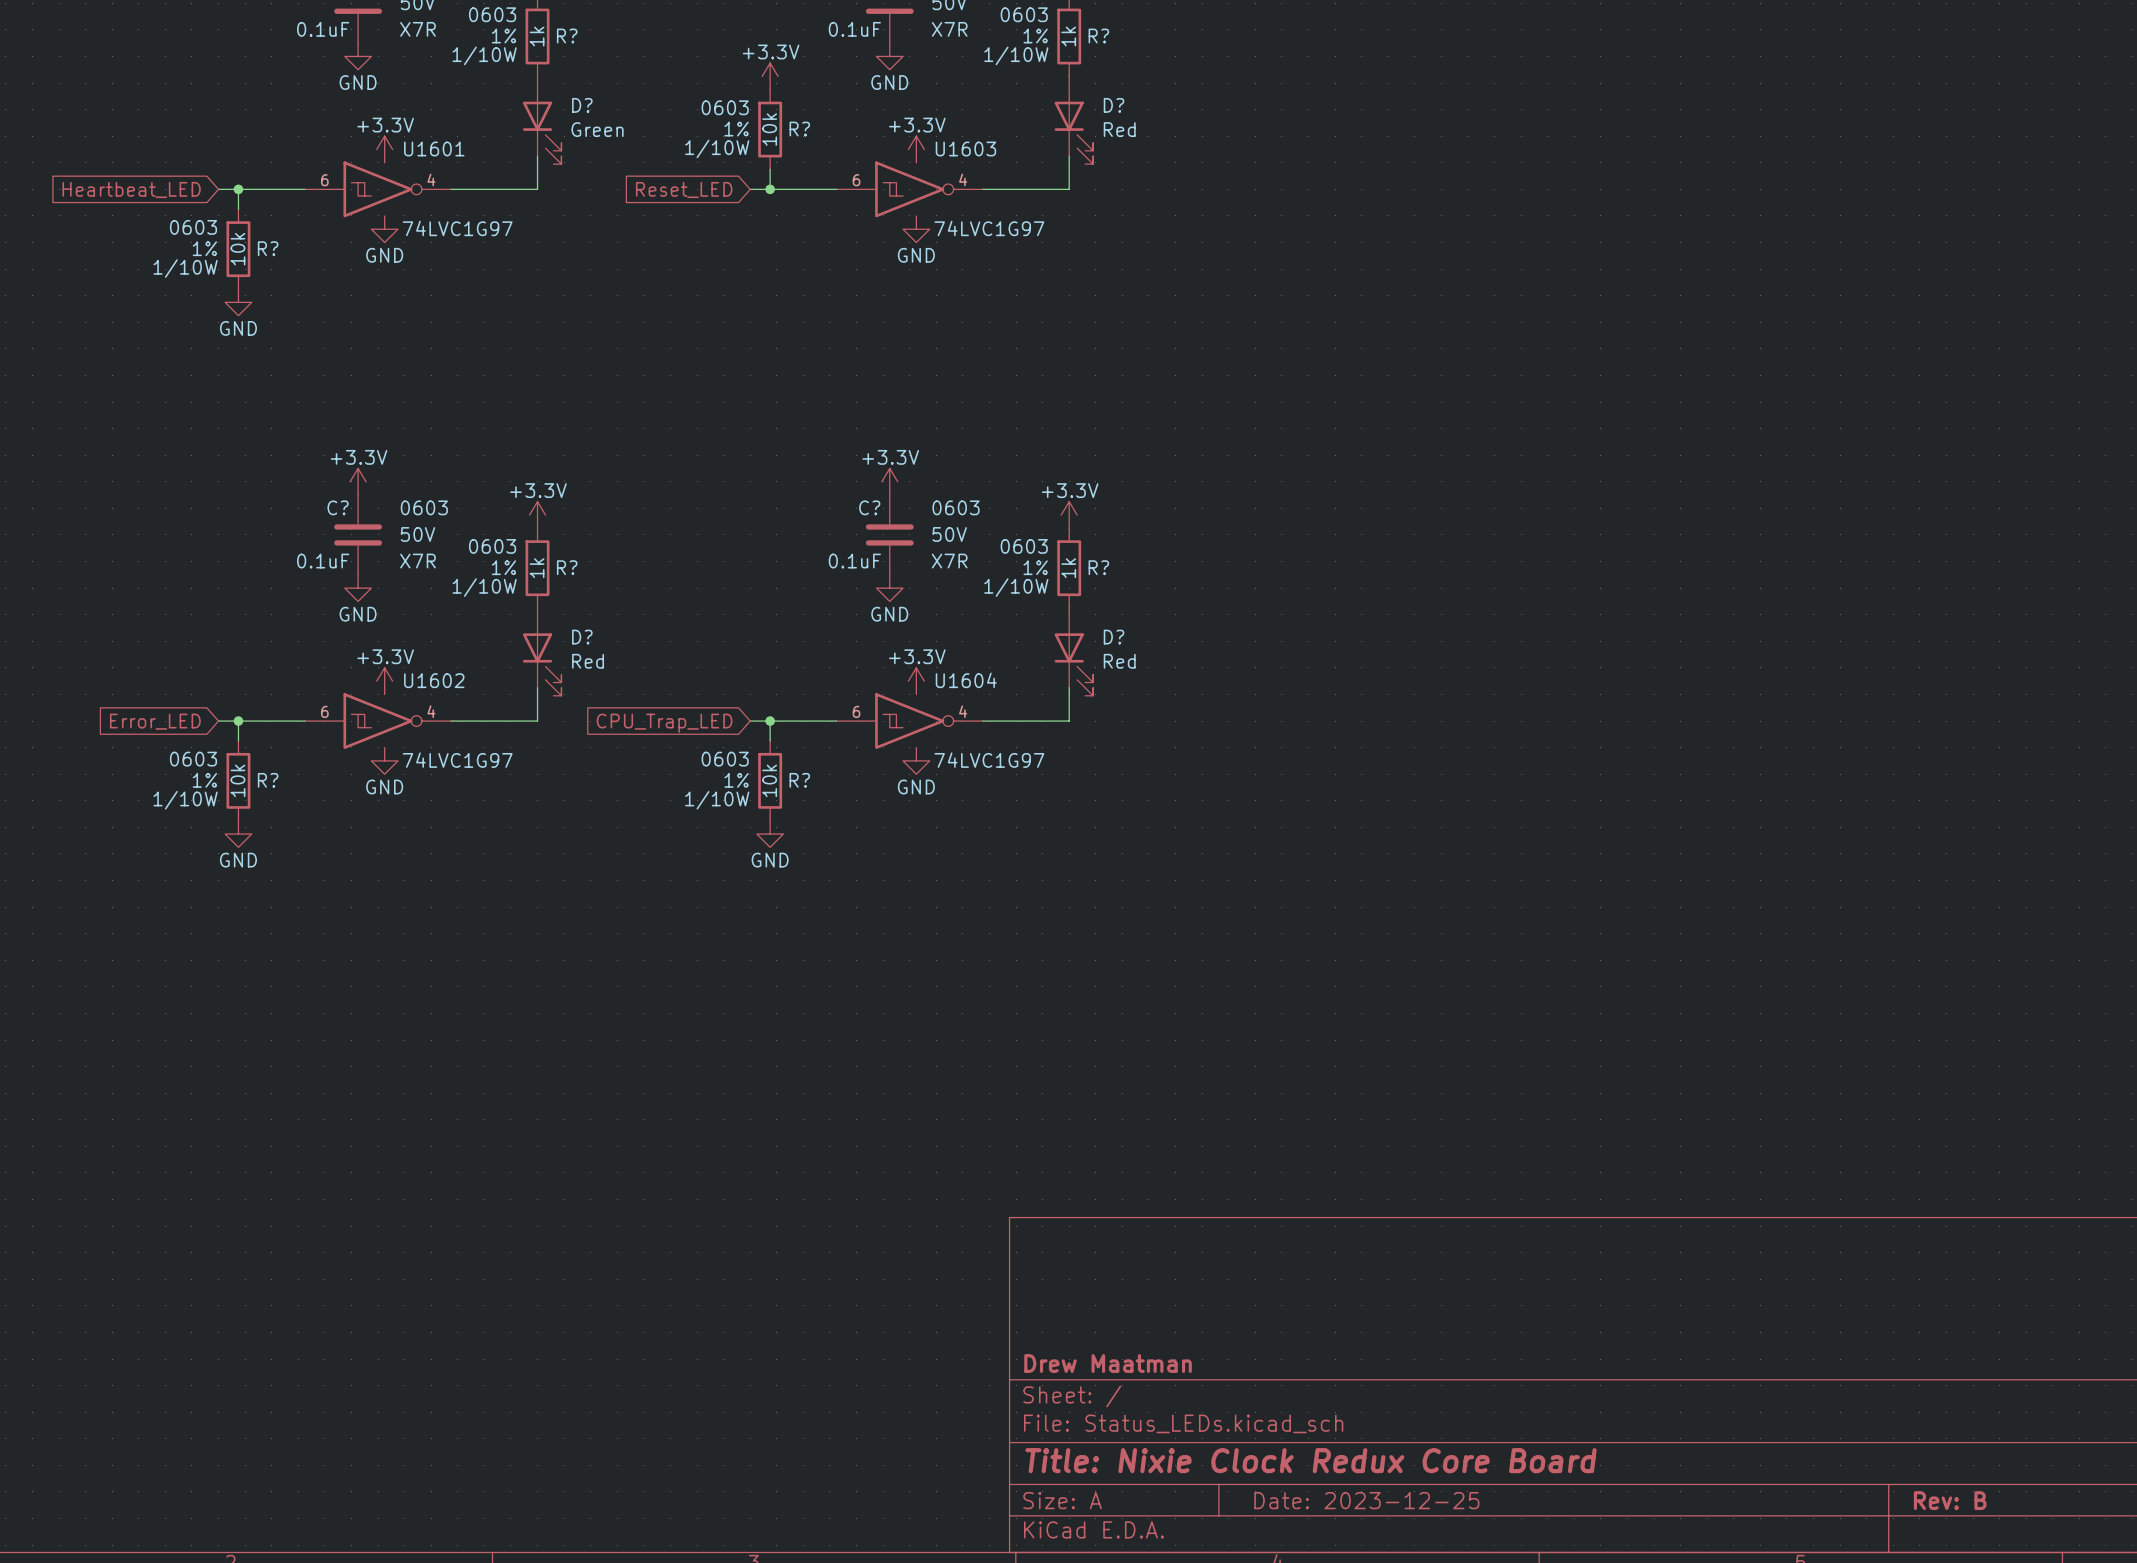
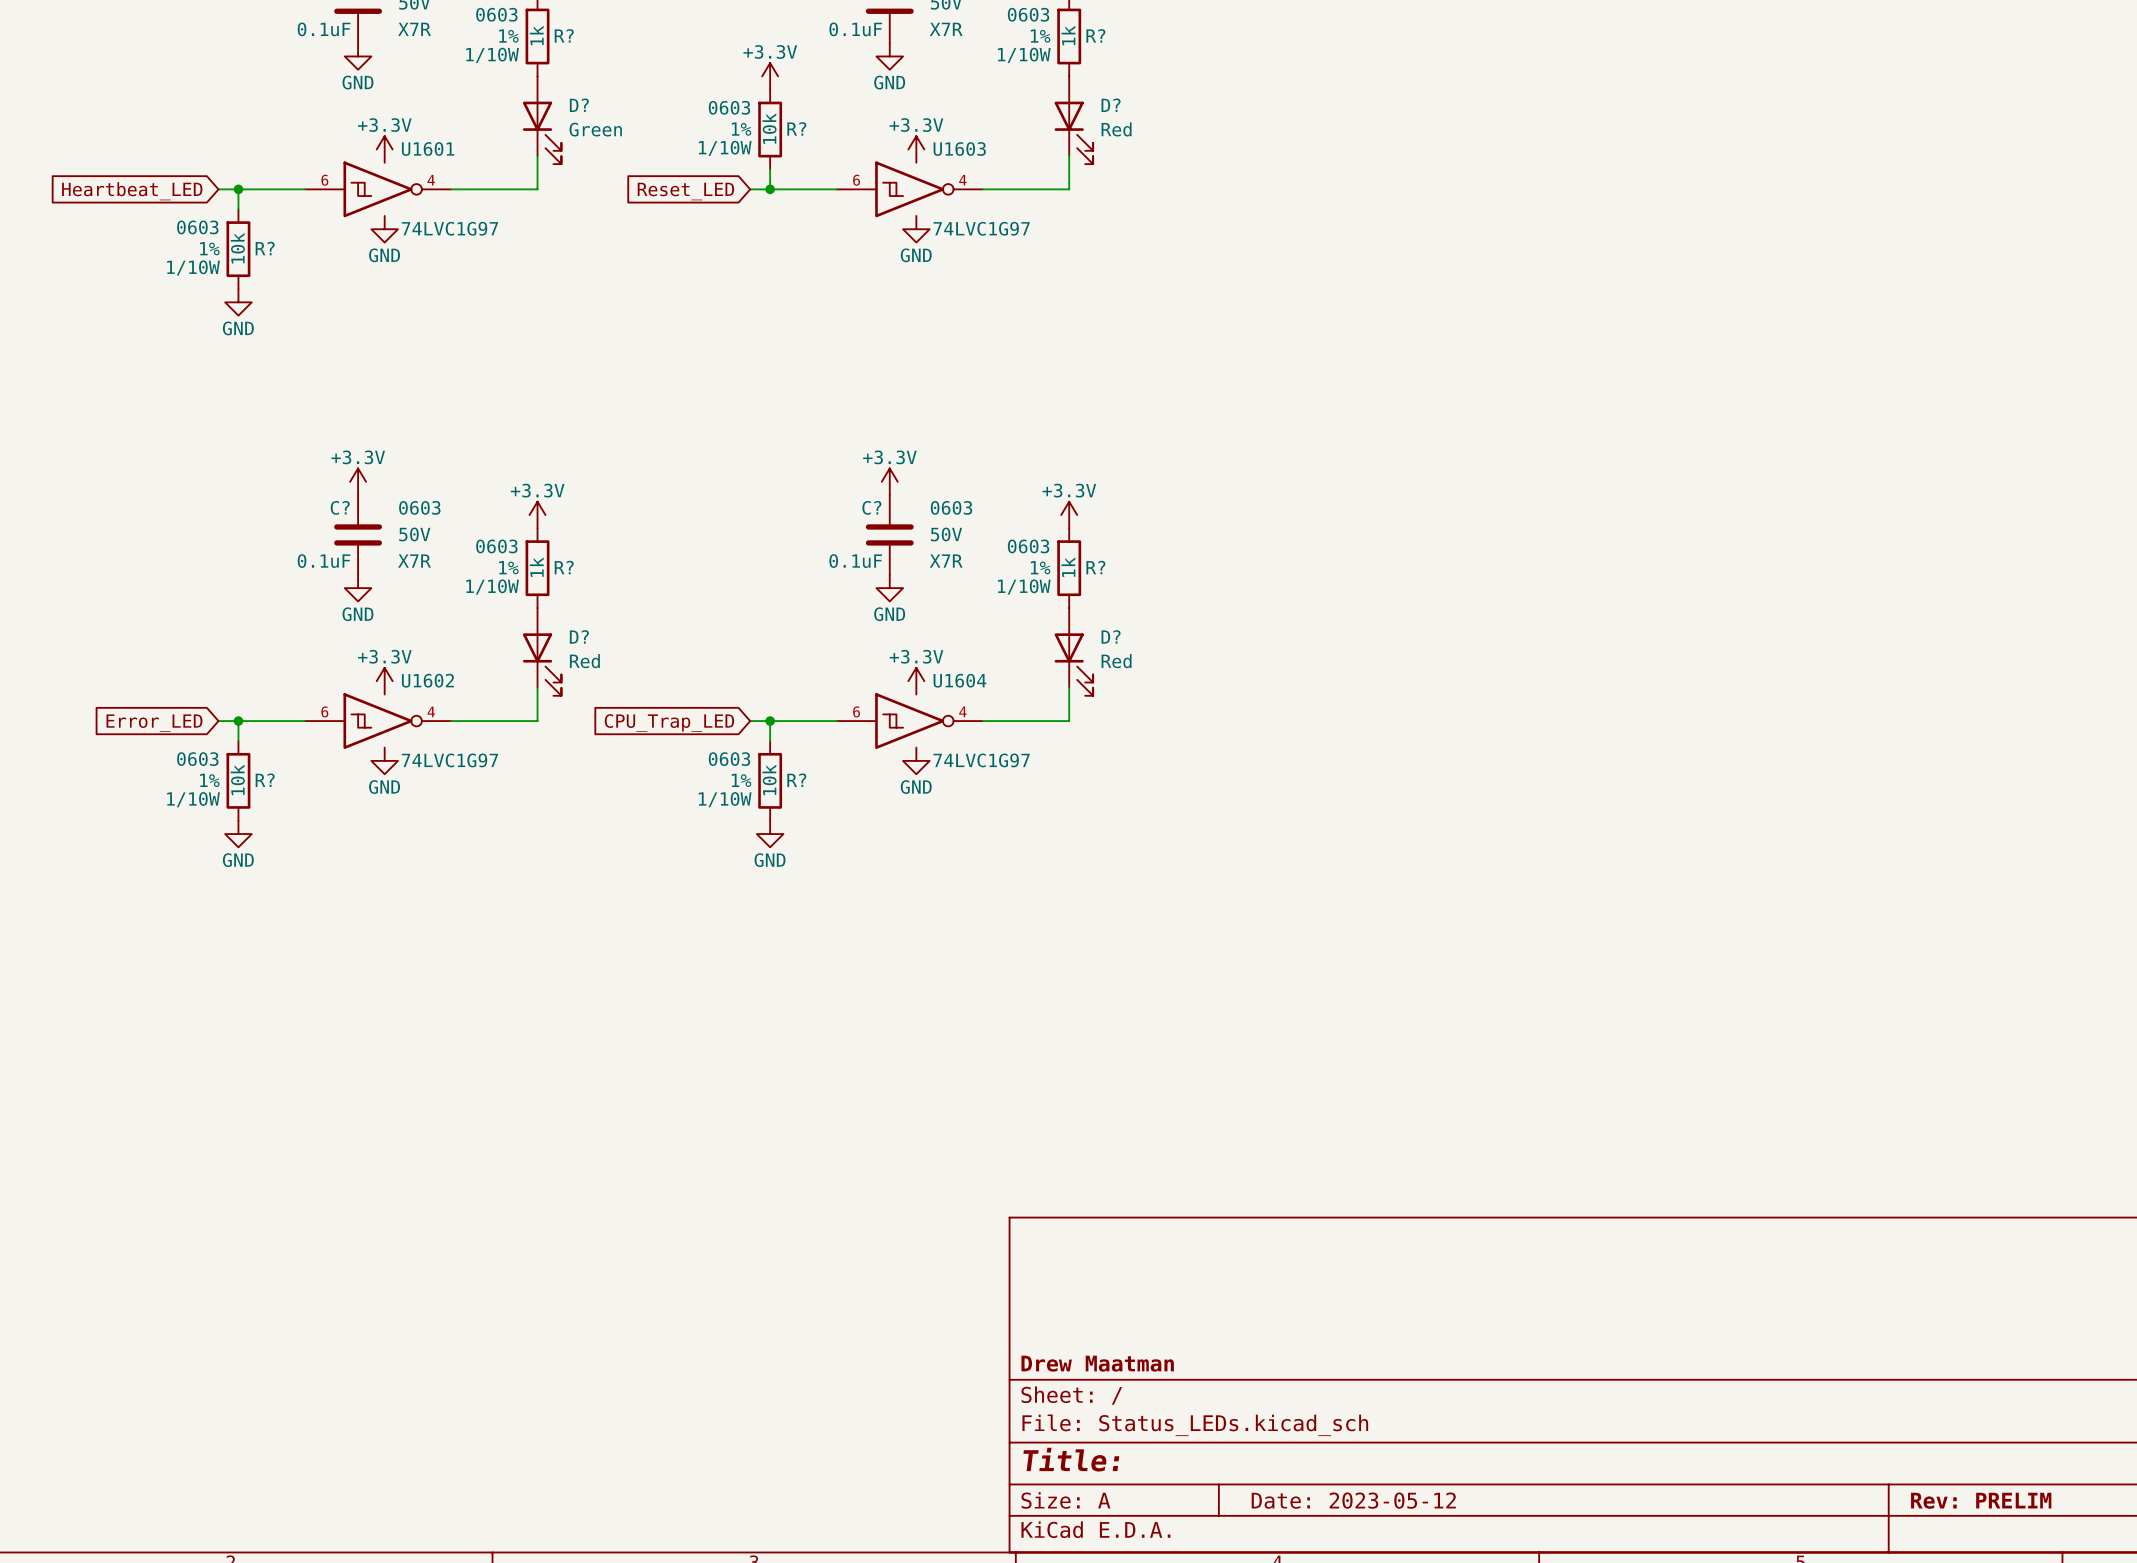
title block: Title: Nixie Clock Redux Core Board (1310, 1460) -> Title: (1071, 1459)
title block: Date: 2023-12-25 (1366, 1500) -> Date: 2023-05-12 (1353, 1500)
title block: Rev: B (1950, 1500) -> Rev: PRELIM (1981, 1500)

